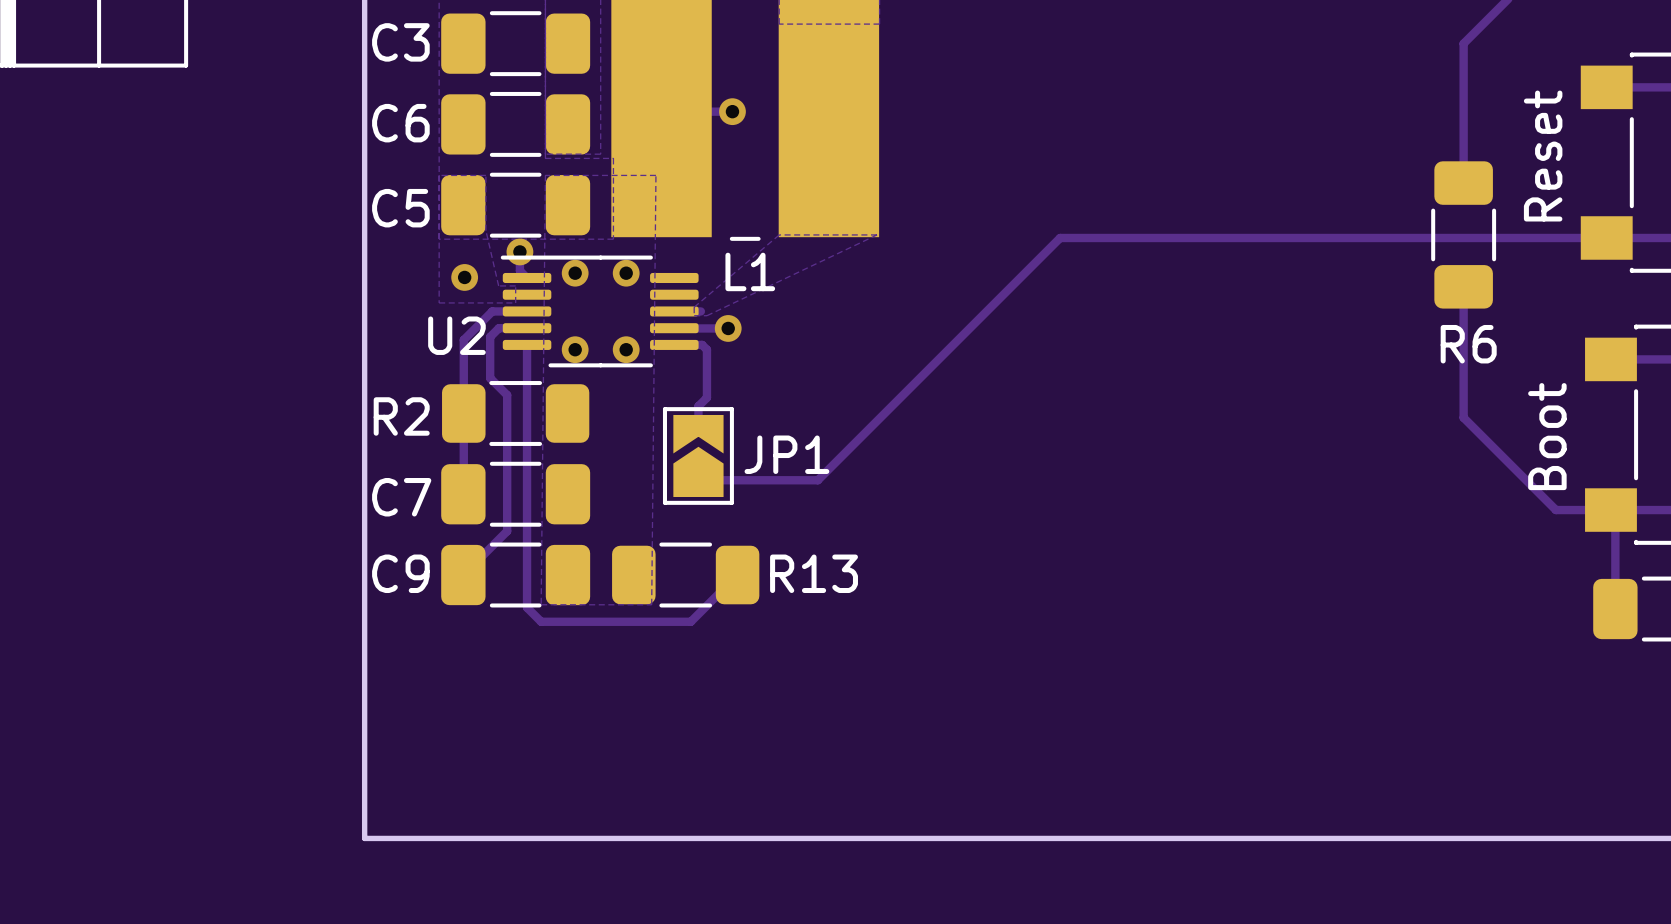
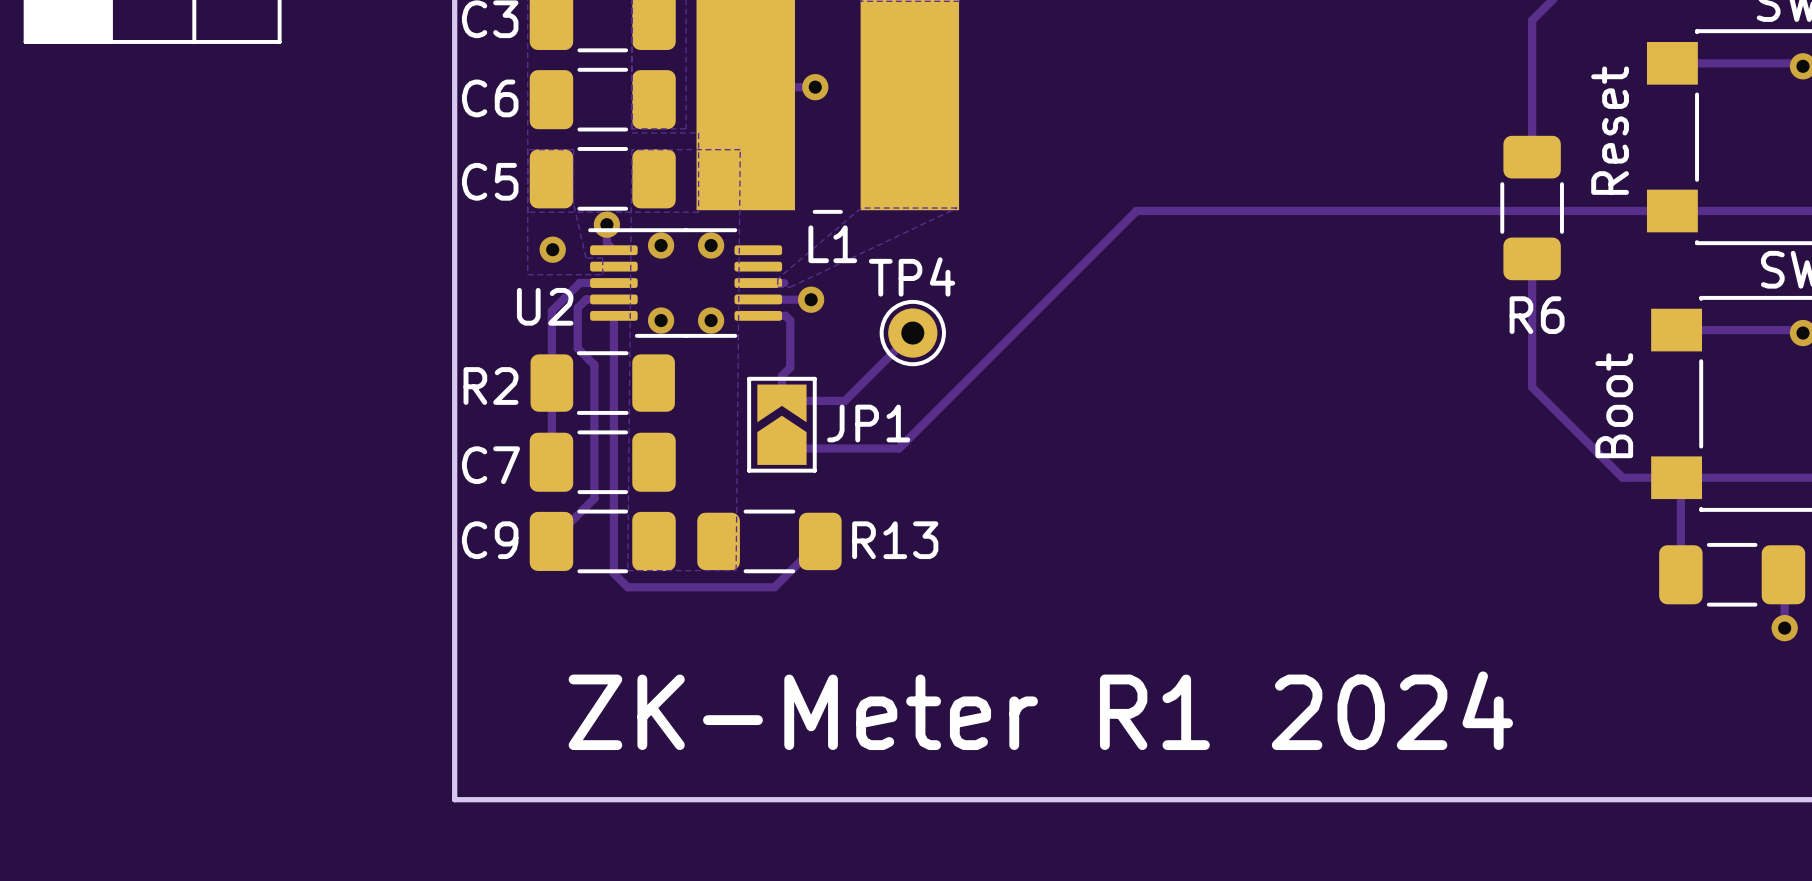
track: none -> (912, 333) (844, 400) (781, 400)
TP4: none -> (912, 333)
text: none -> ZK-Meter R1 2024 (1040, 710)

